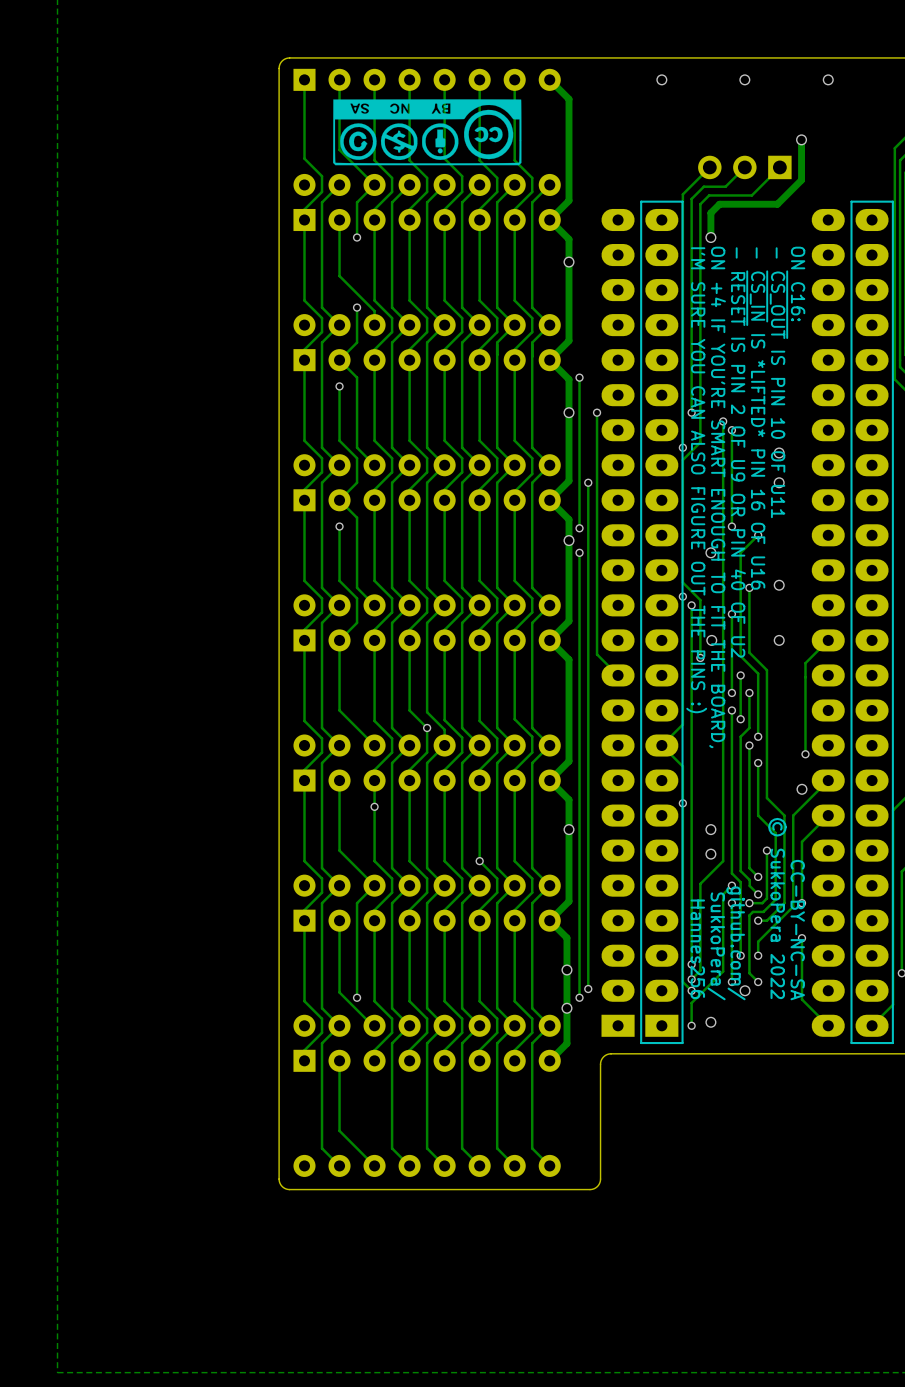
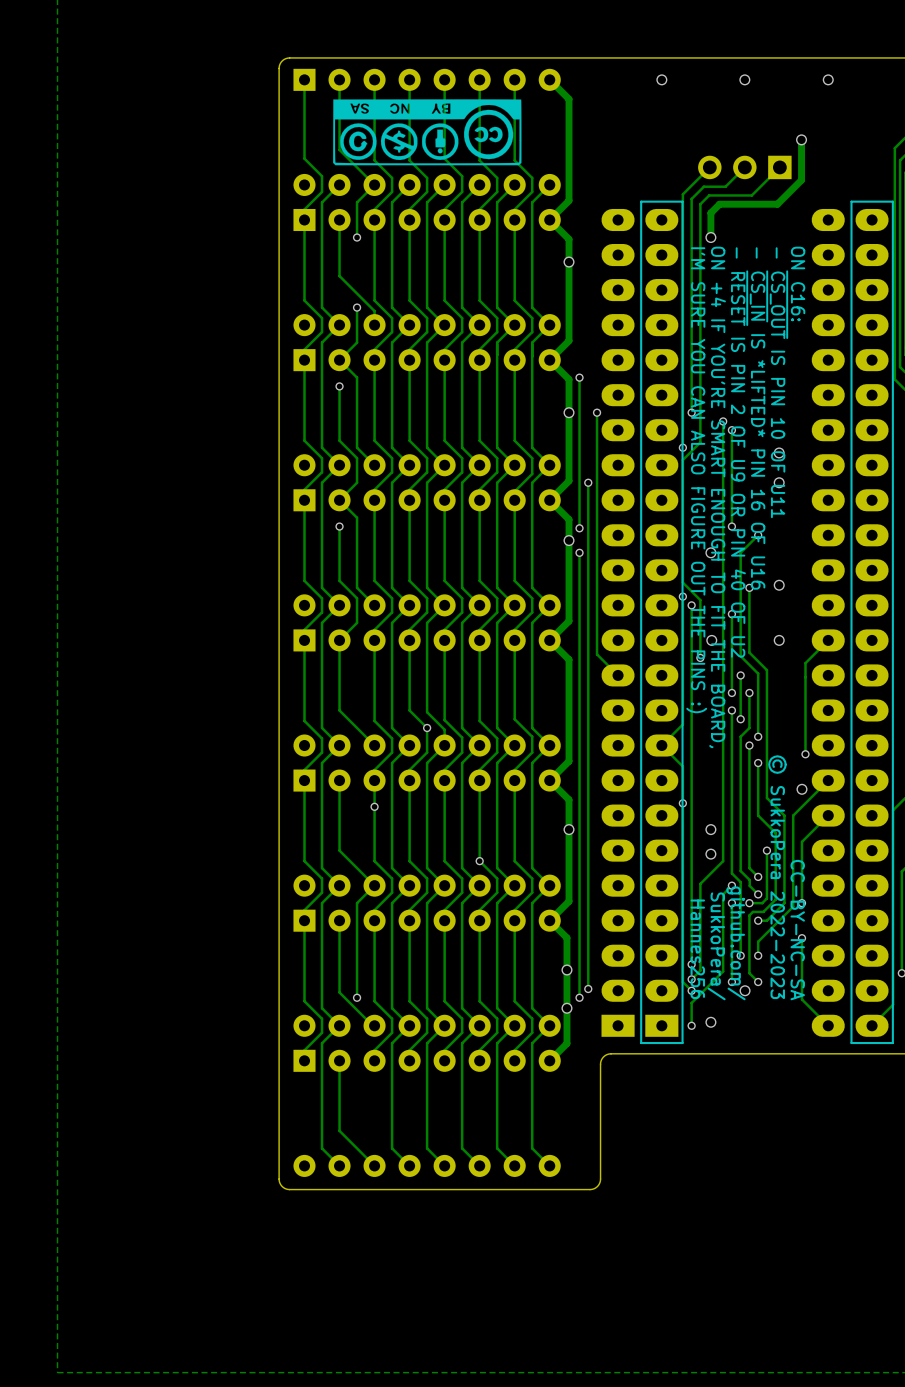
text: © SukkoPera 2022 (777, 908) -> © SukkoPera 2022-2023 (777, 877)

